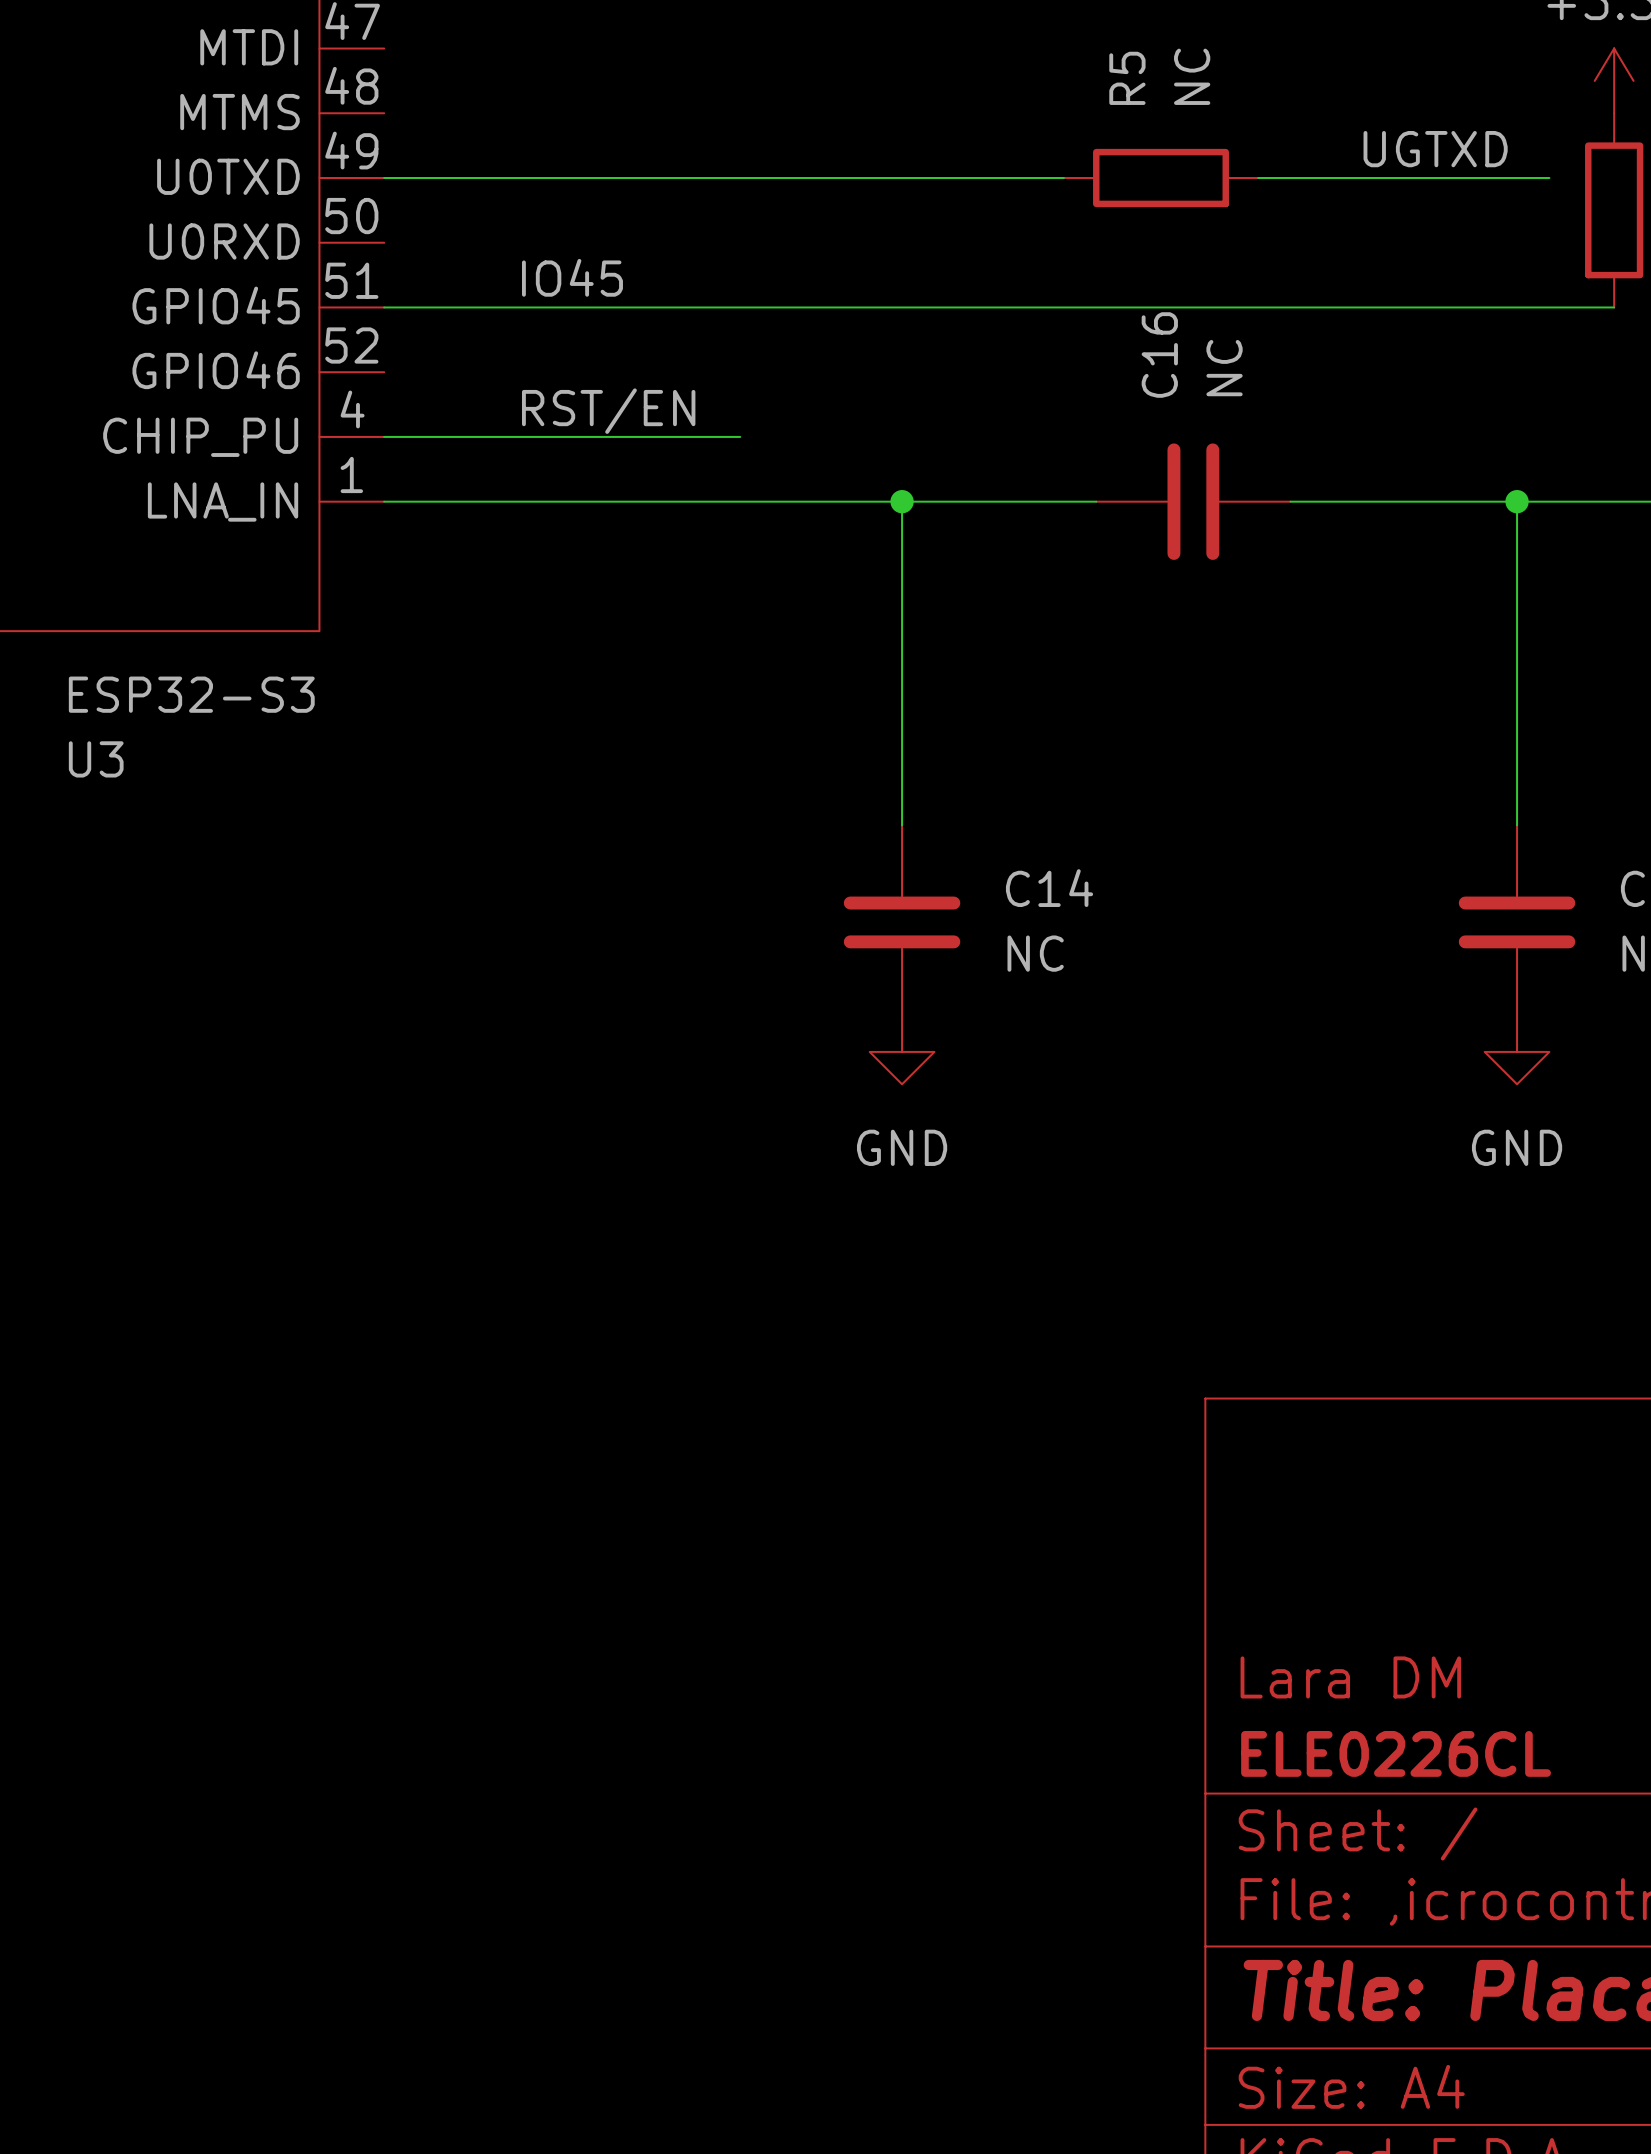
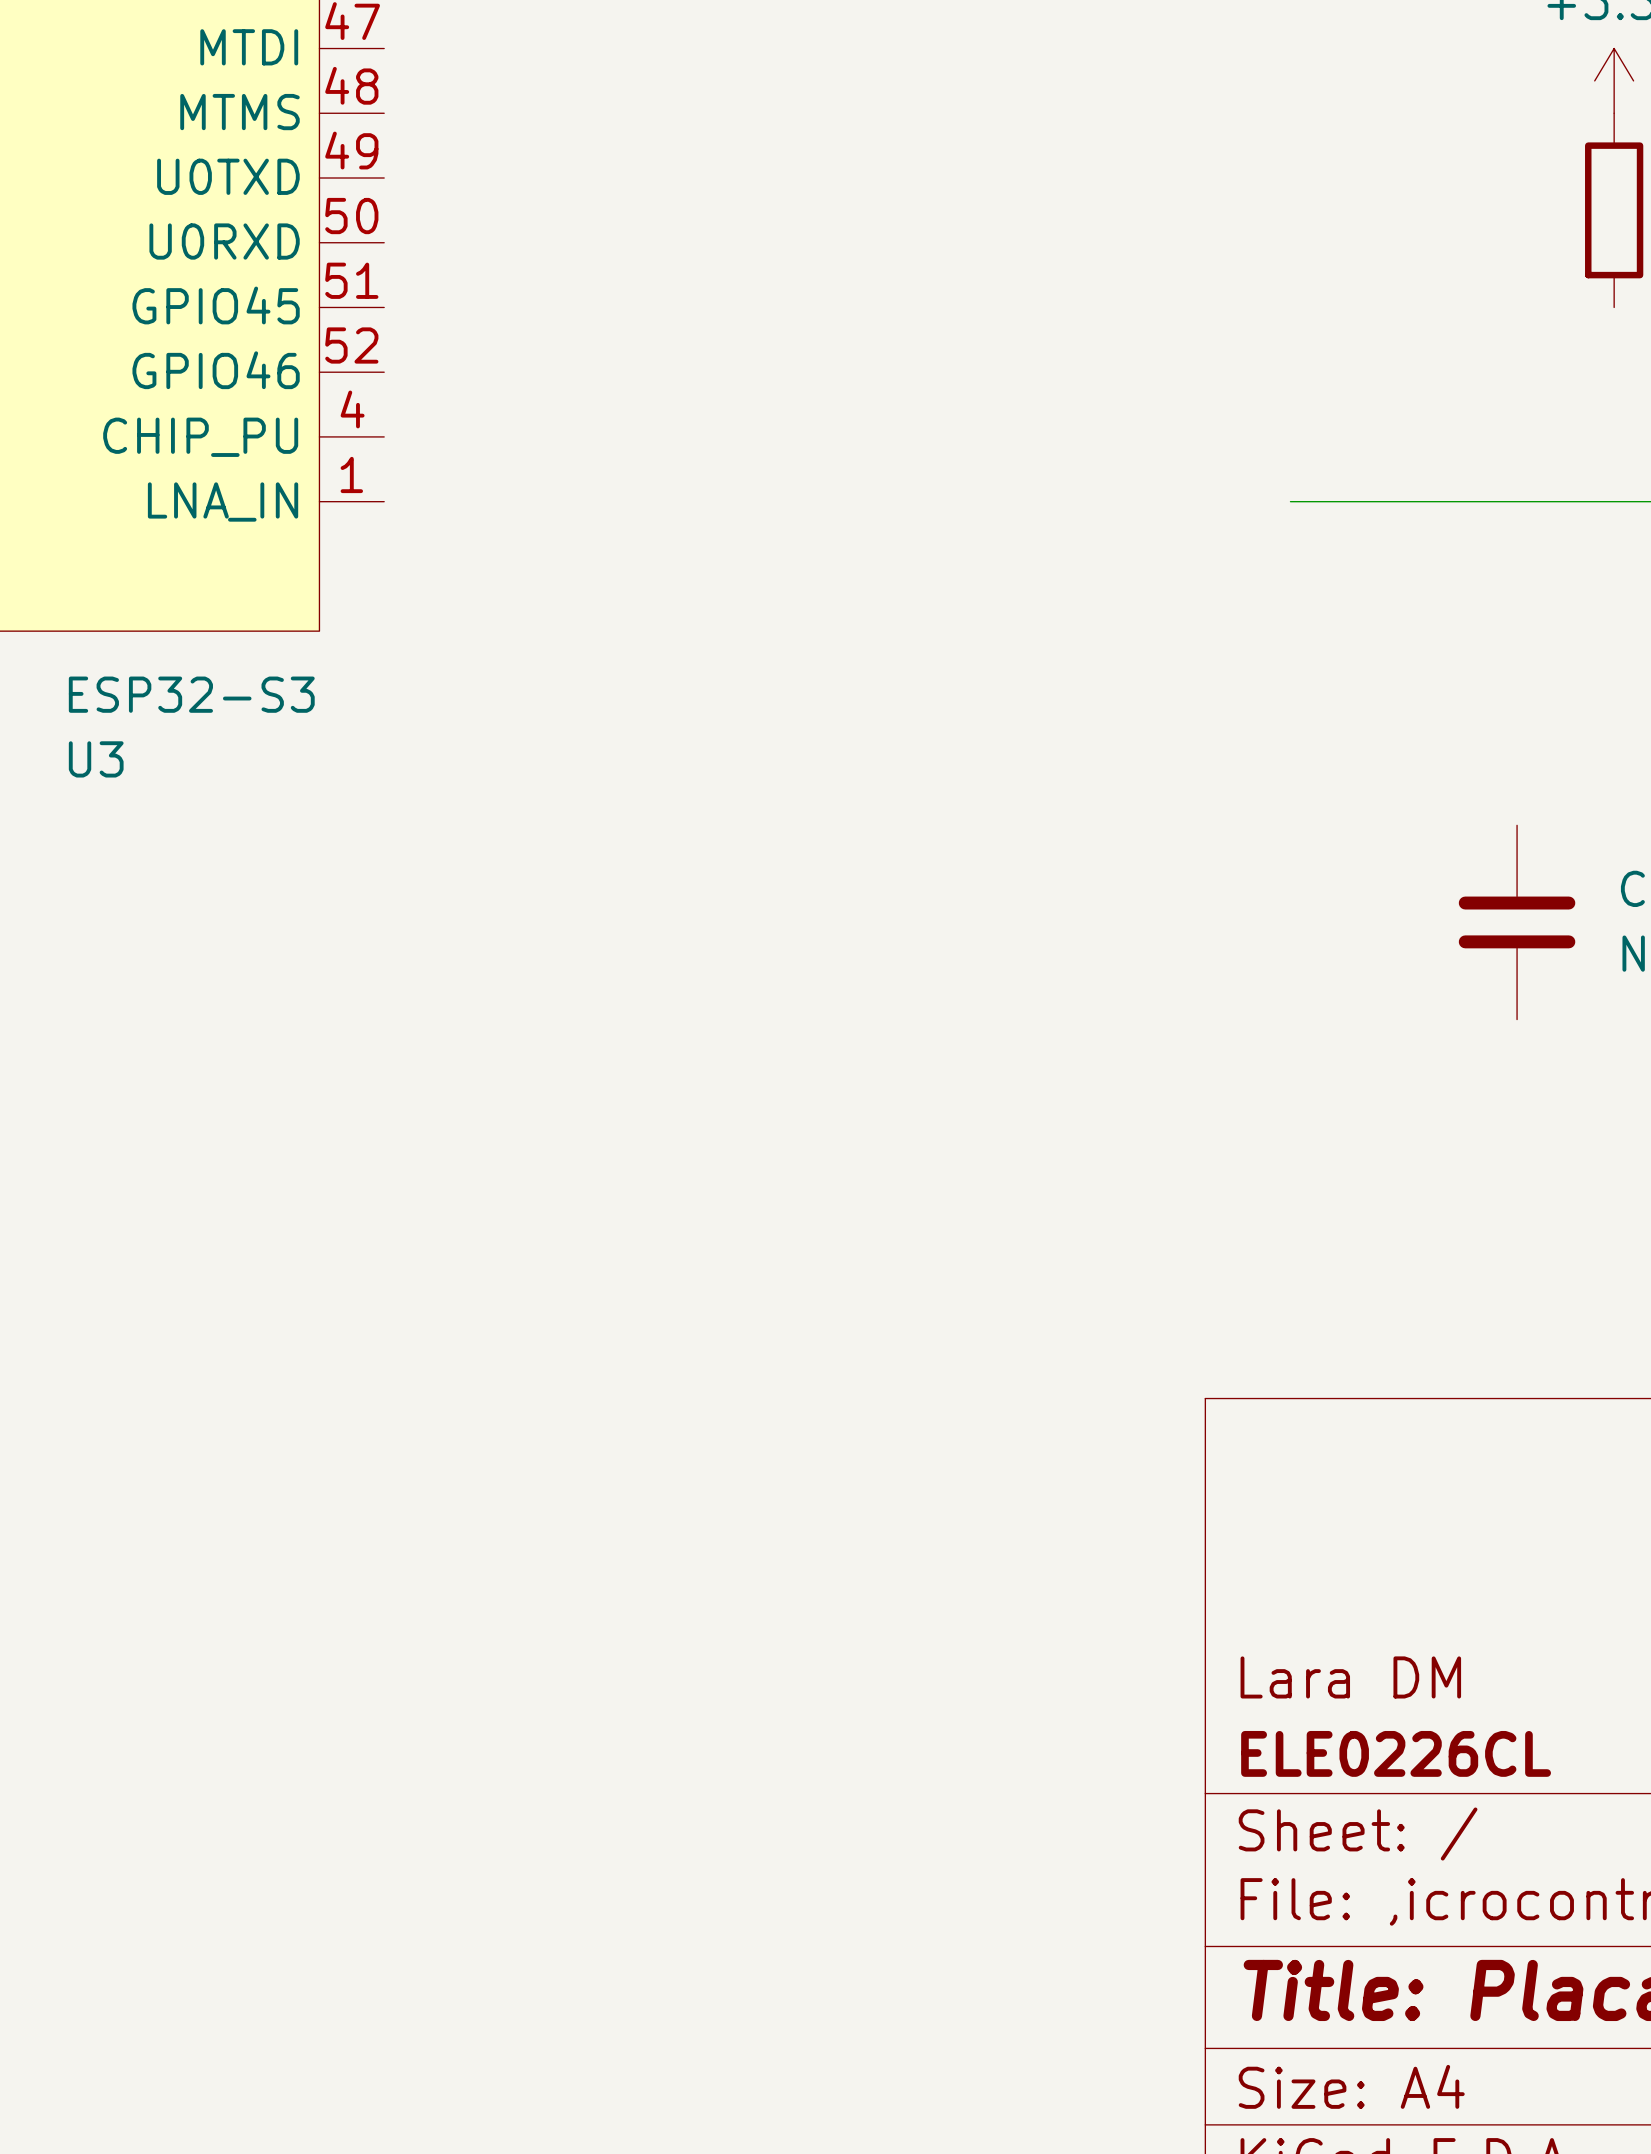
label: UGTXD (1435, 149) -> none
wire: (384, 178) (1063, 178) -> none
R5: NC (1161, 178) -> none
wire: (1258, 178) (1549, 178) -> none
label: IO45 (572, 277) -> none
wire: (384, 307) (1614, 307) -> none
label: RST/EN (608, 411) -> none
wire: (384, 436) (740, 436) -> none
wire: (384, 501) (1096, 501) -> none
wire: (902, 501) (902, 825) -> none
junction: (902, 501) -> none
C16: NC (1193, 501) -> none
wire: (1517, 501) (1517, 825) -> none
junction: (1517, 501) -> none
C14: NC (902, 922) -> none
power symbol: GND (902, 1051) -> none
power symbol: GND (1517, 1051) -> none

